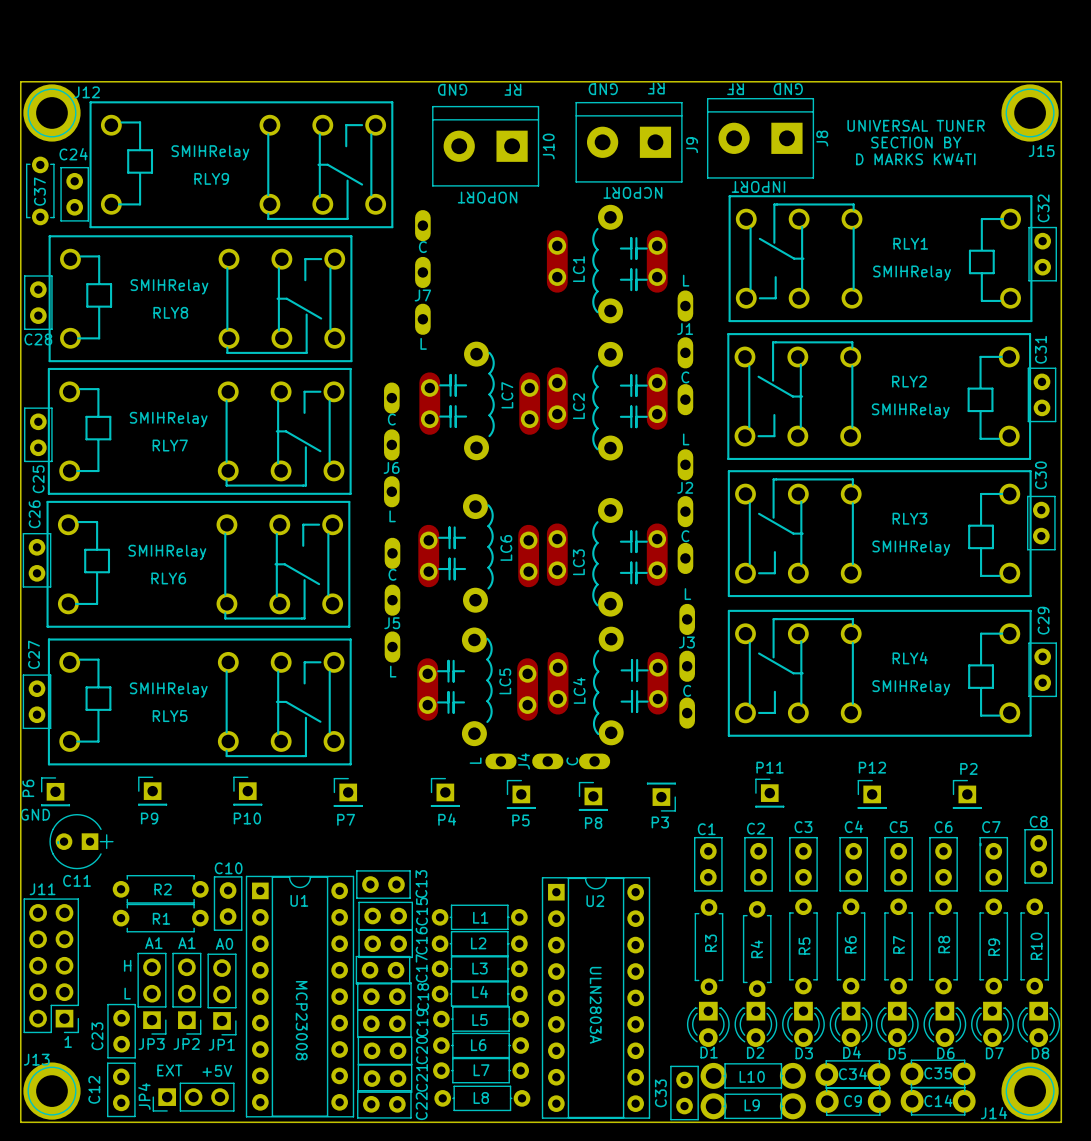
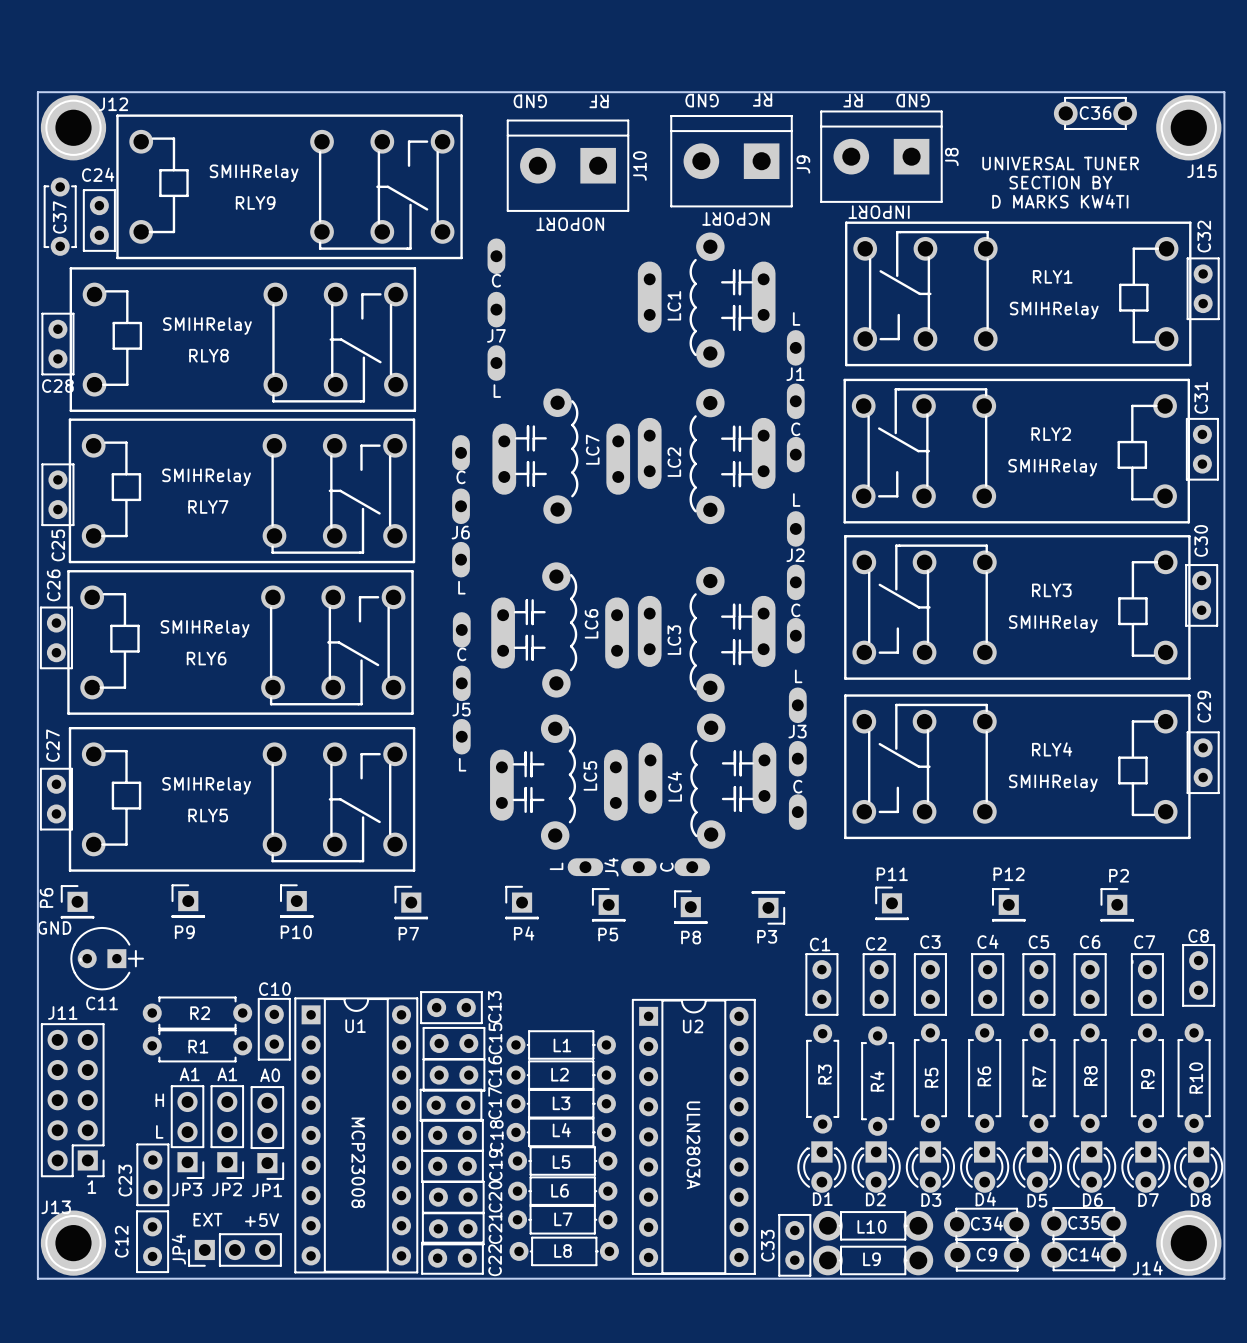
C36: none -> (1095, 113)
text: UNIVERSAL TUNER (916, 125) -> none
text: SECTION BY (916, 142) -> UNIVERSAL TUNER (1060, 163)
text: D MARKS KW4TI (915, 159) -> SECTION BY (1060, 182)
text: none -> D MARKS KW4TI (1060, 201)

